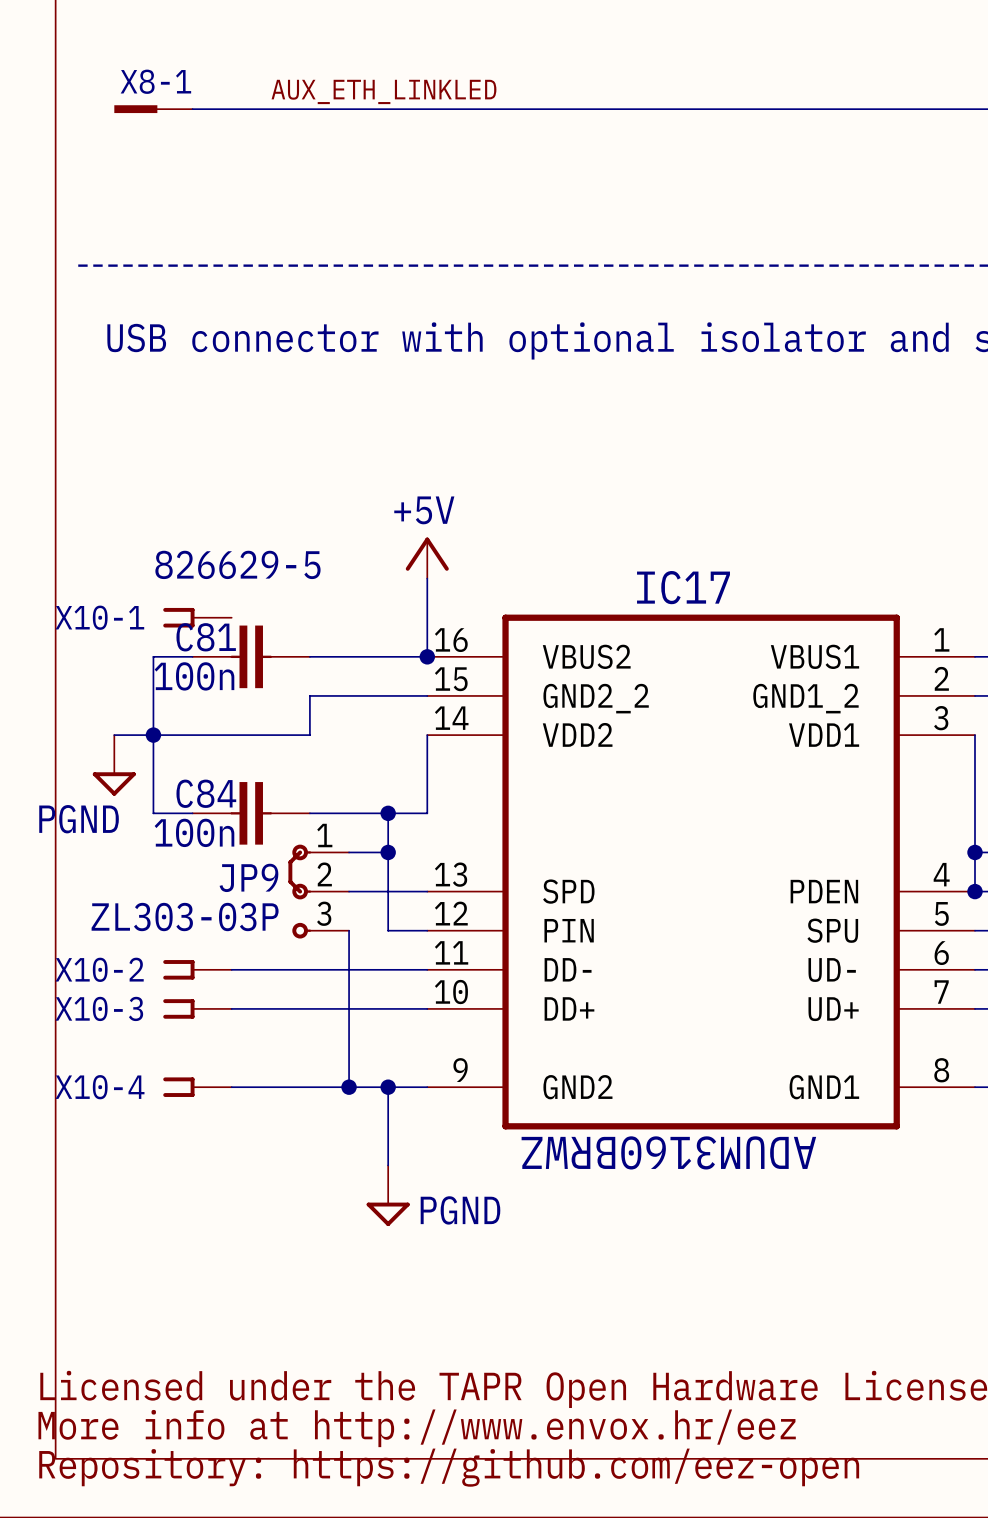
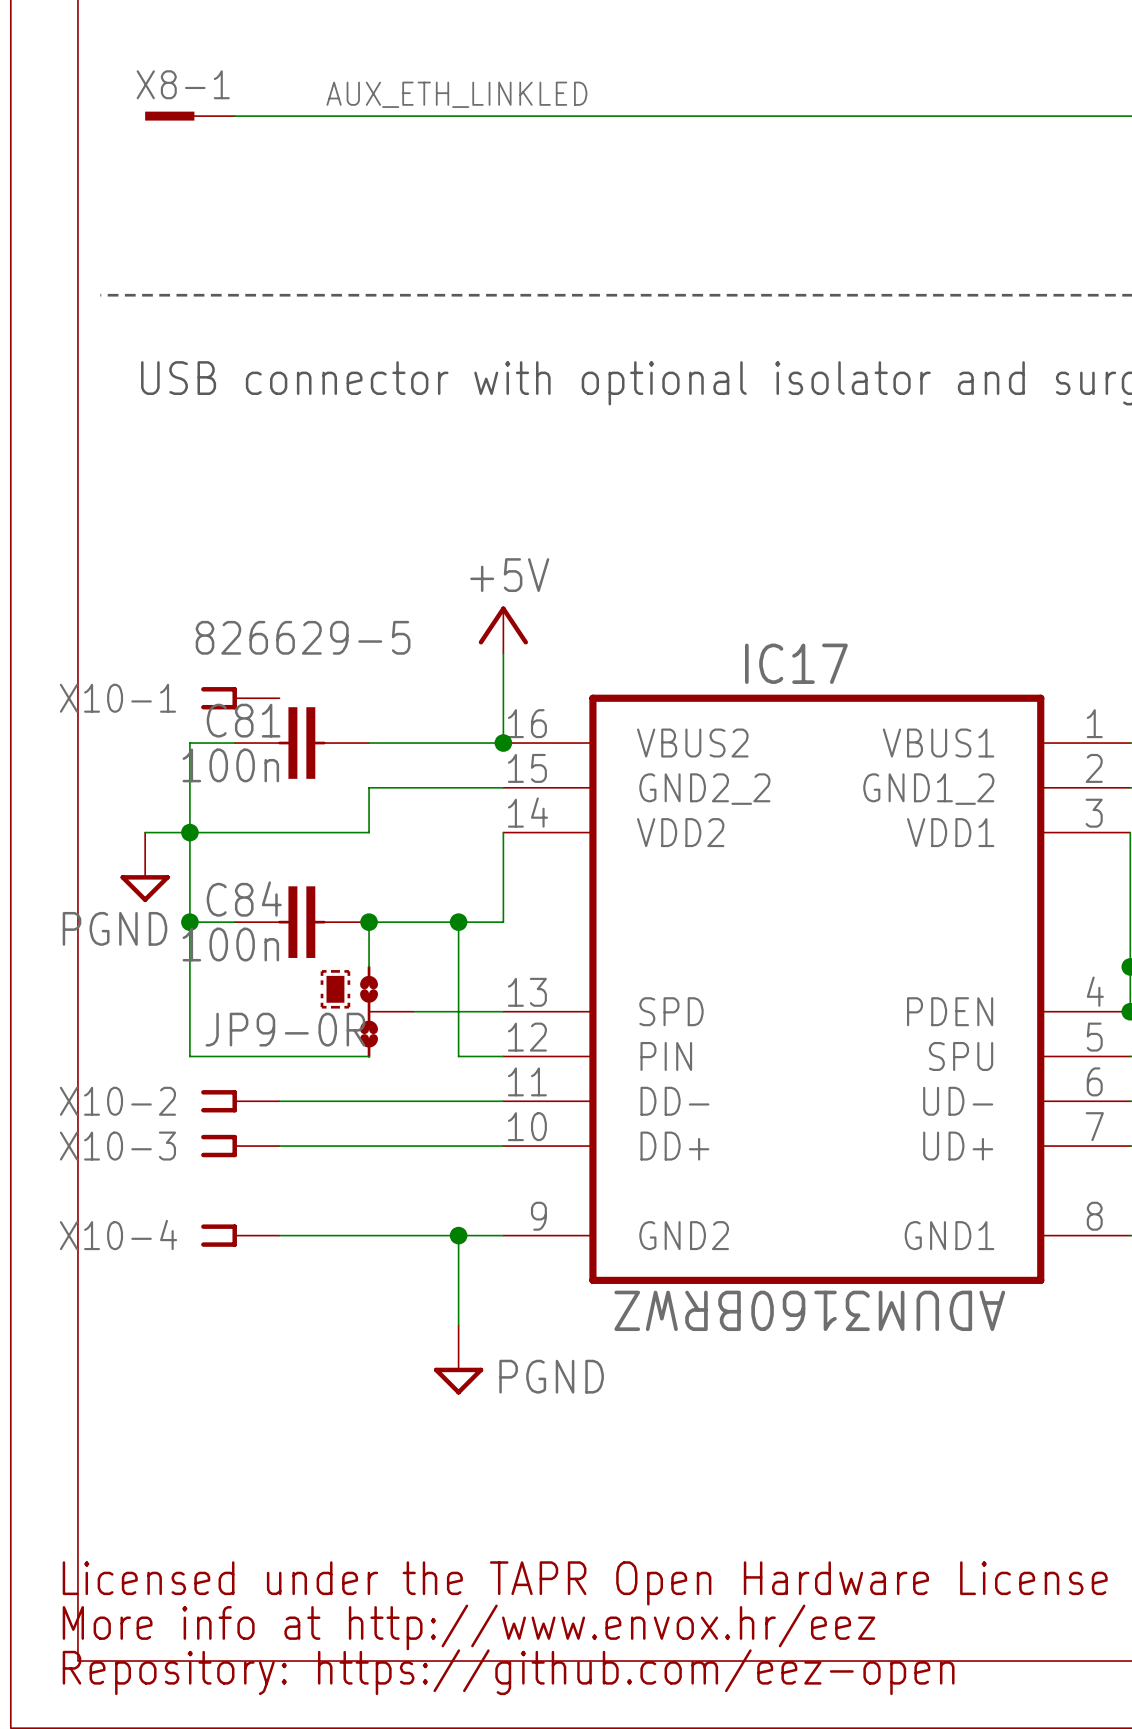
wire: none -> (189, 922) (189, 1056) (369, 1056)
junction: none -> (189, 922)
wire: none -> (369, 922) (369, 966)
wire: (349, 852) (388, 852) -> none
junction position: (388, 852) -> (369, 922)
part: none -> (335, 989)
JP9: ZL303-03P (318, 891) -> none
JP9-0R: none -> (386, 1011)
wire: (349, 930) (349, 1087) -> none
junction: (349, 1087) -> none

